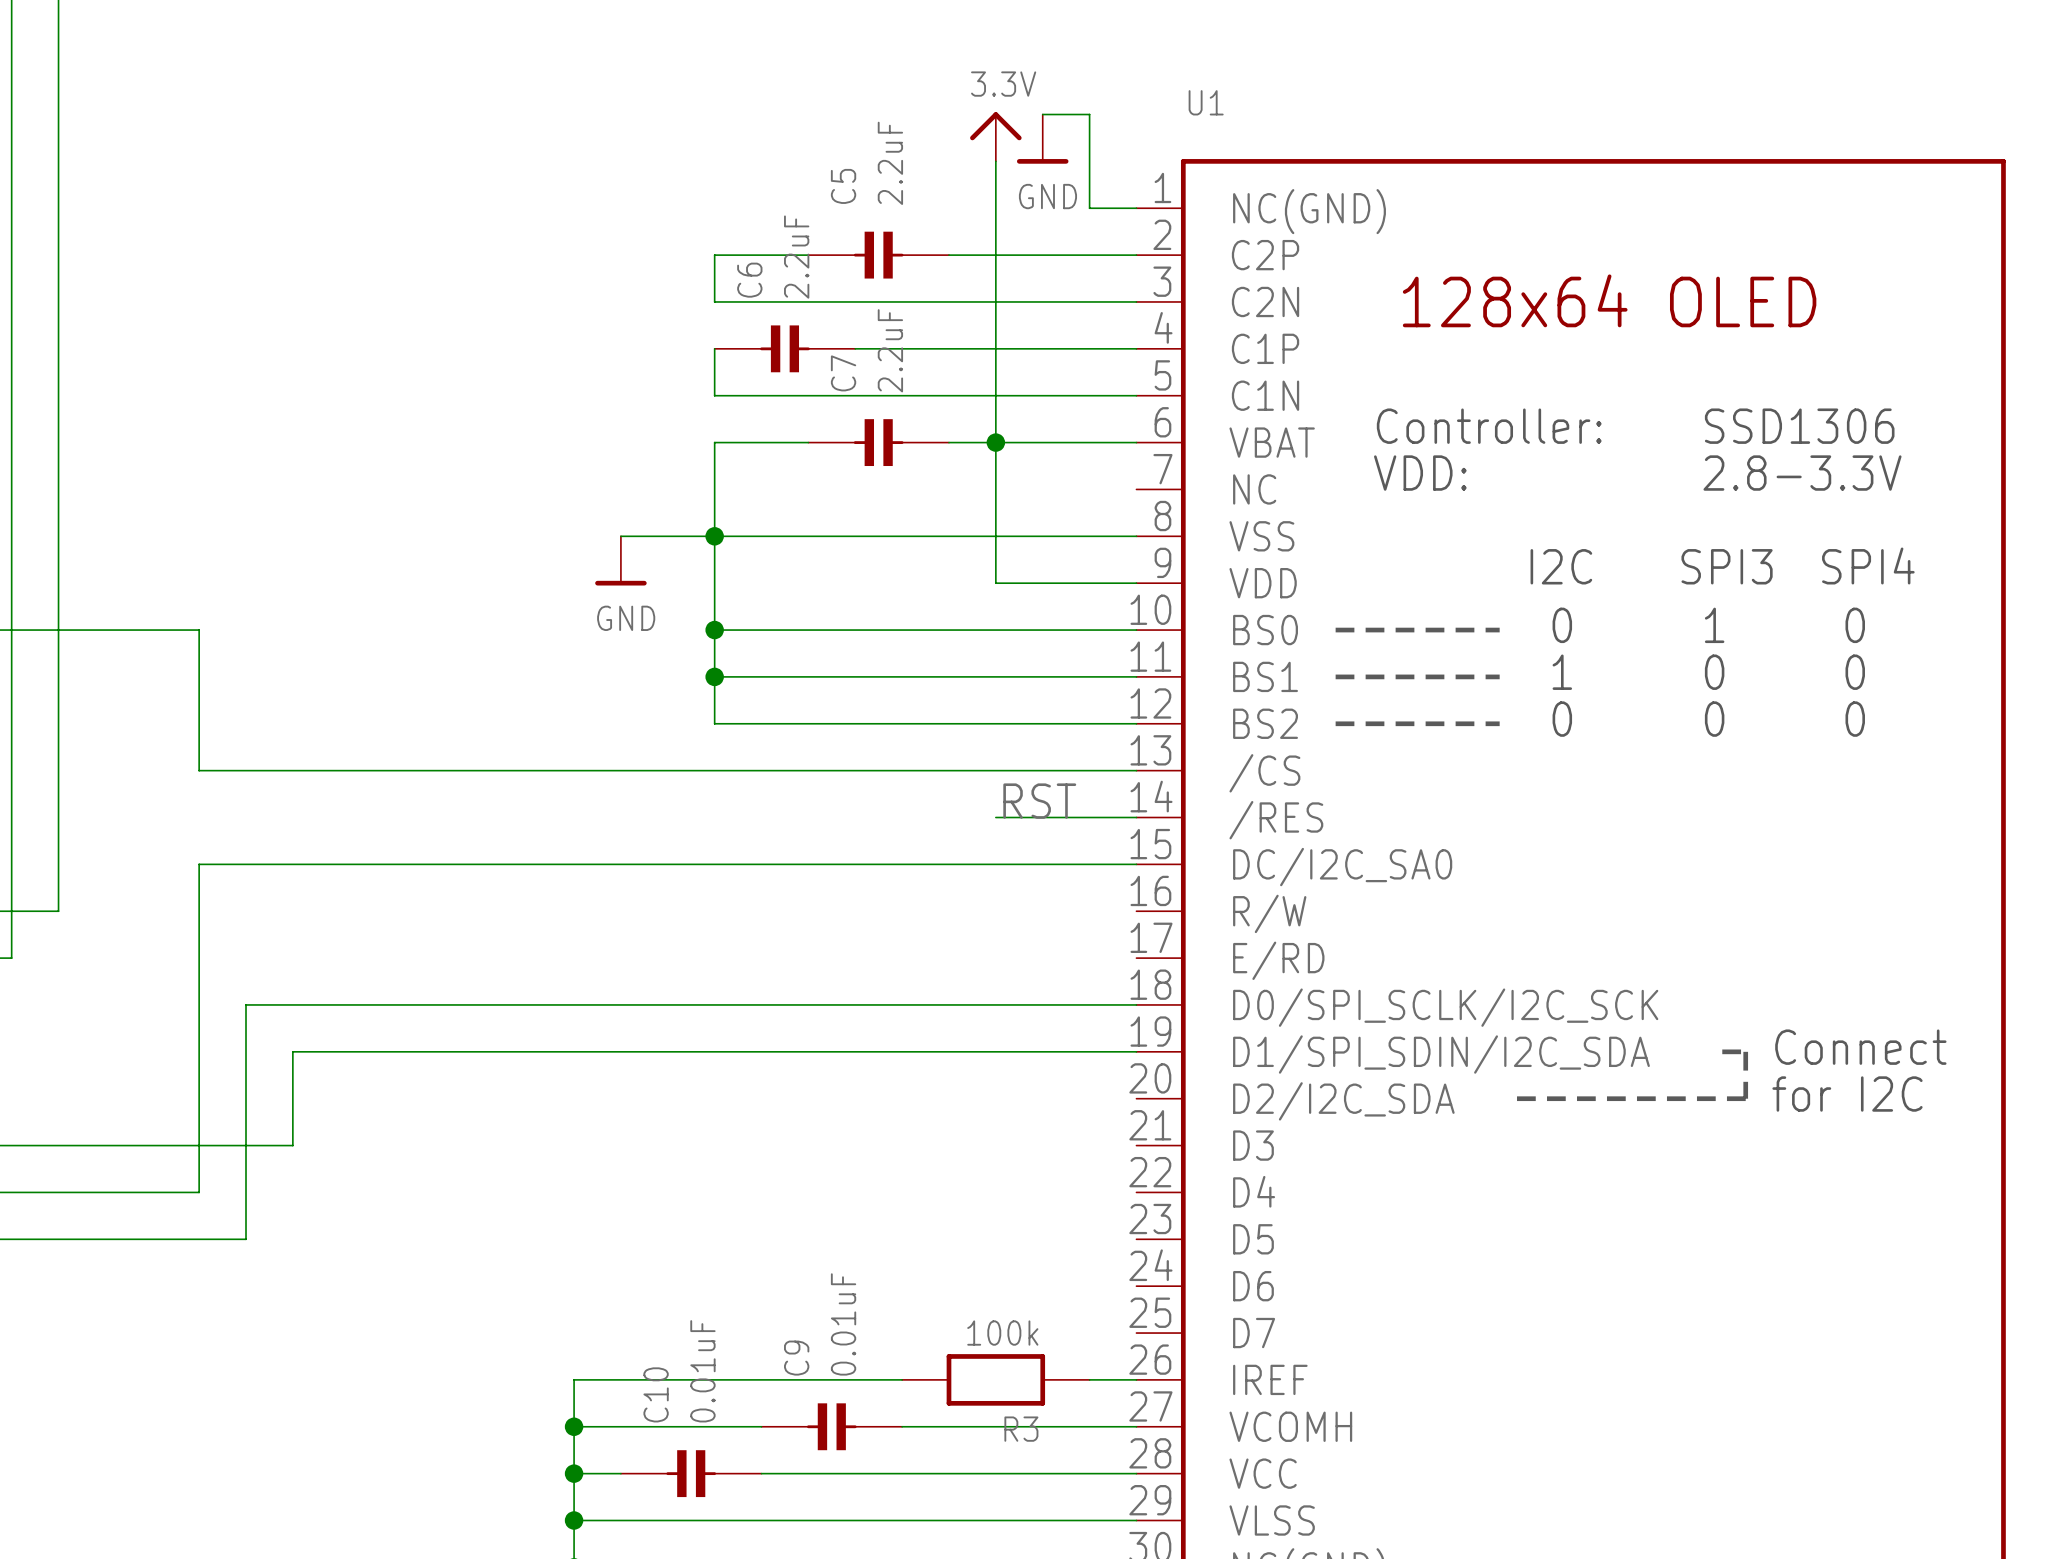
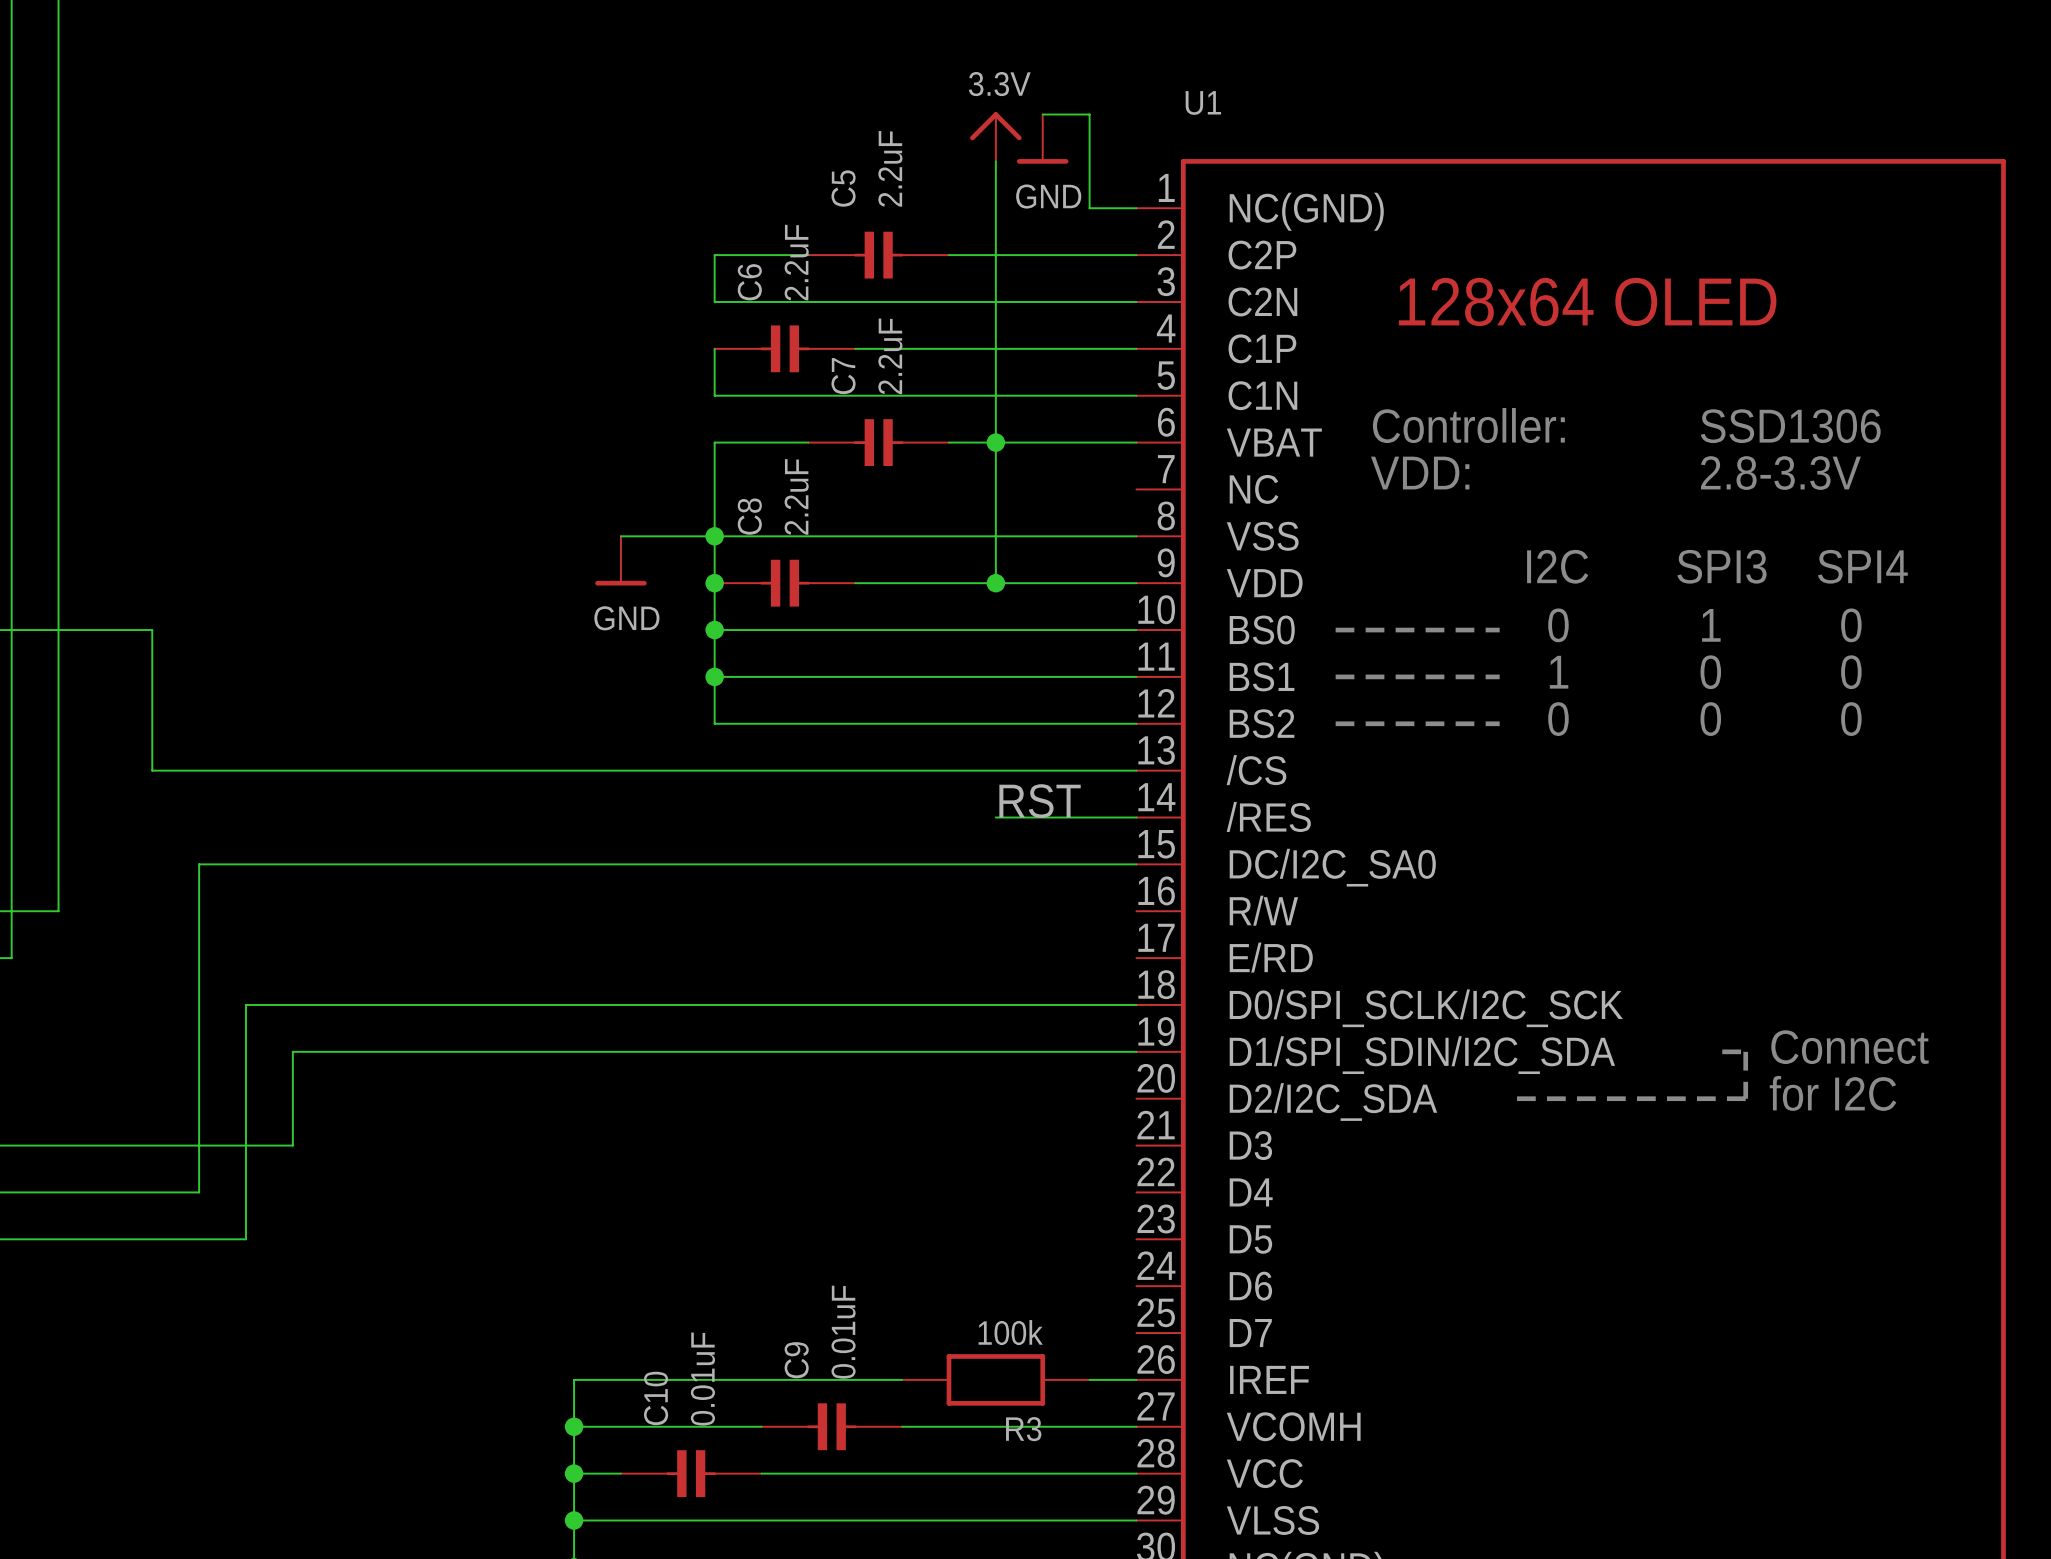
junction: none -> (714, 583)
C8: none -> 2.2uF (784, 583)
wire: none -> (855, 583) (995, 583)
junction: none -> (995, 583)
wire: (152, 630) (199, 630) (199, 770) -> (152, 630) (152, 770) (199, 770)

